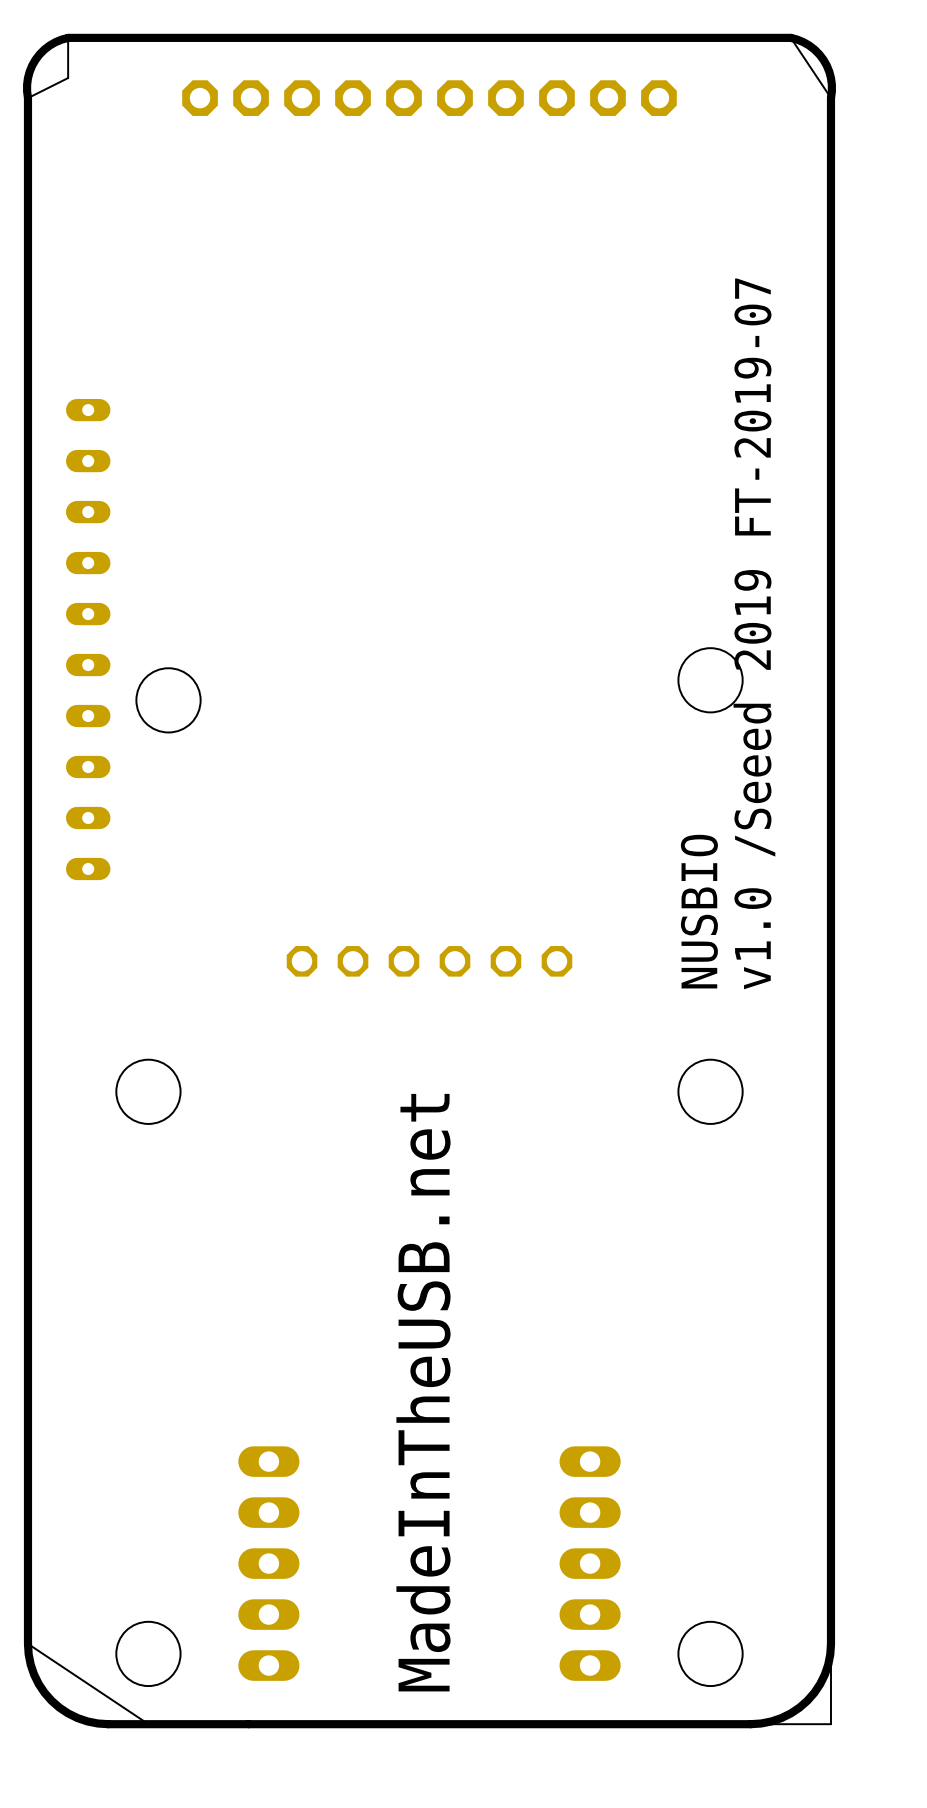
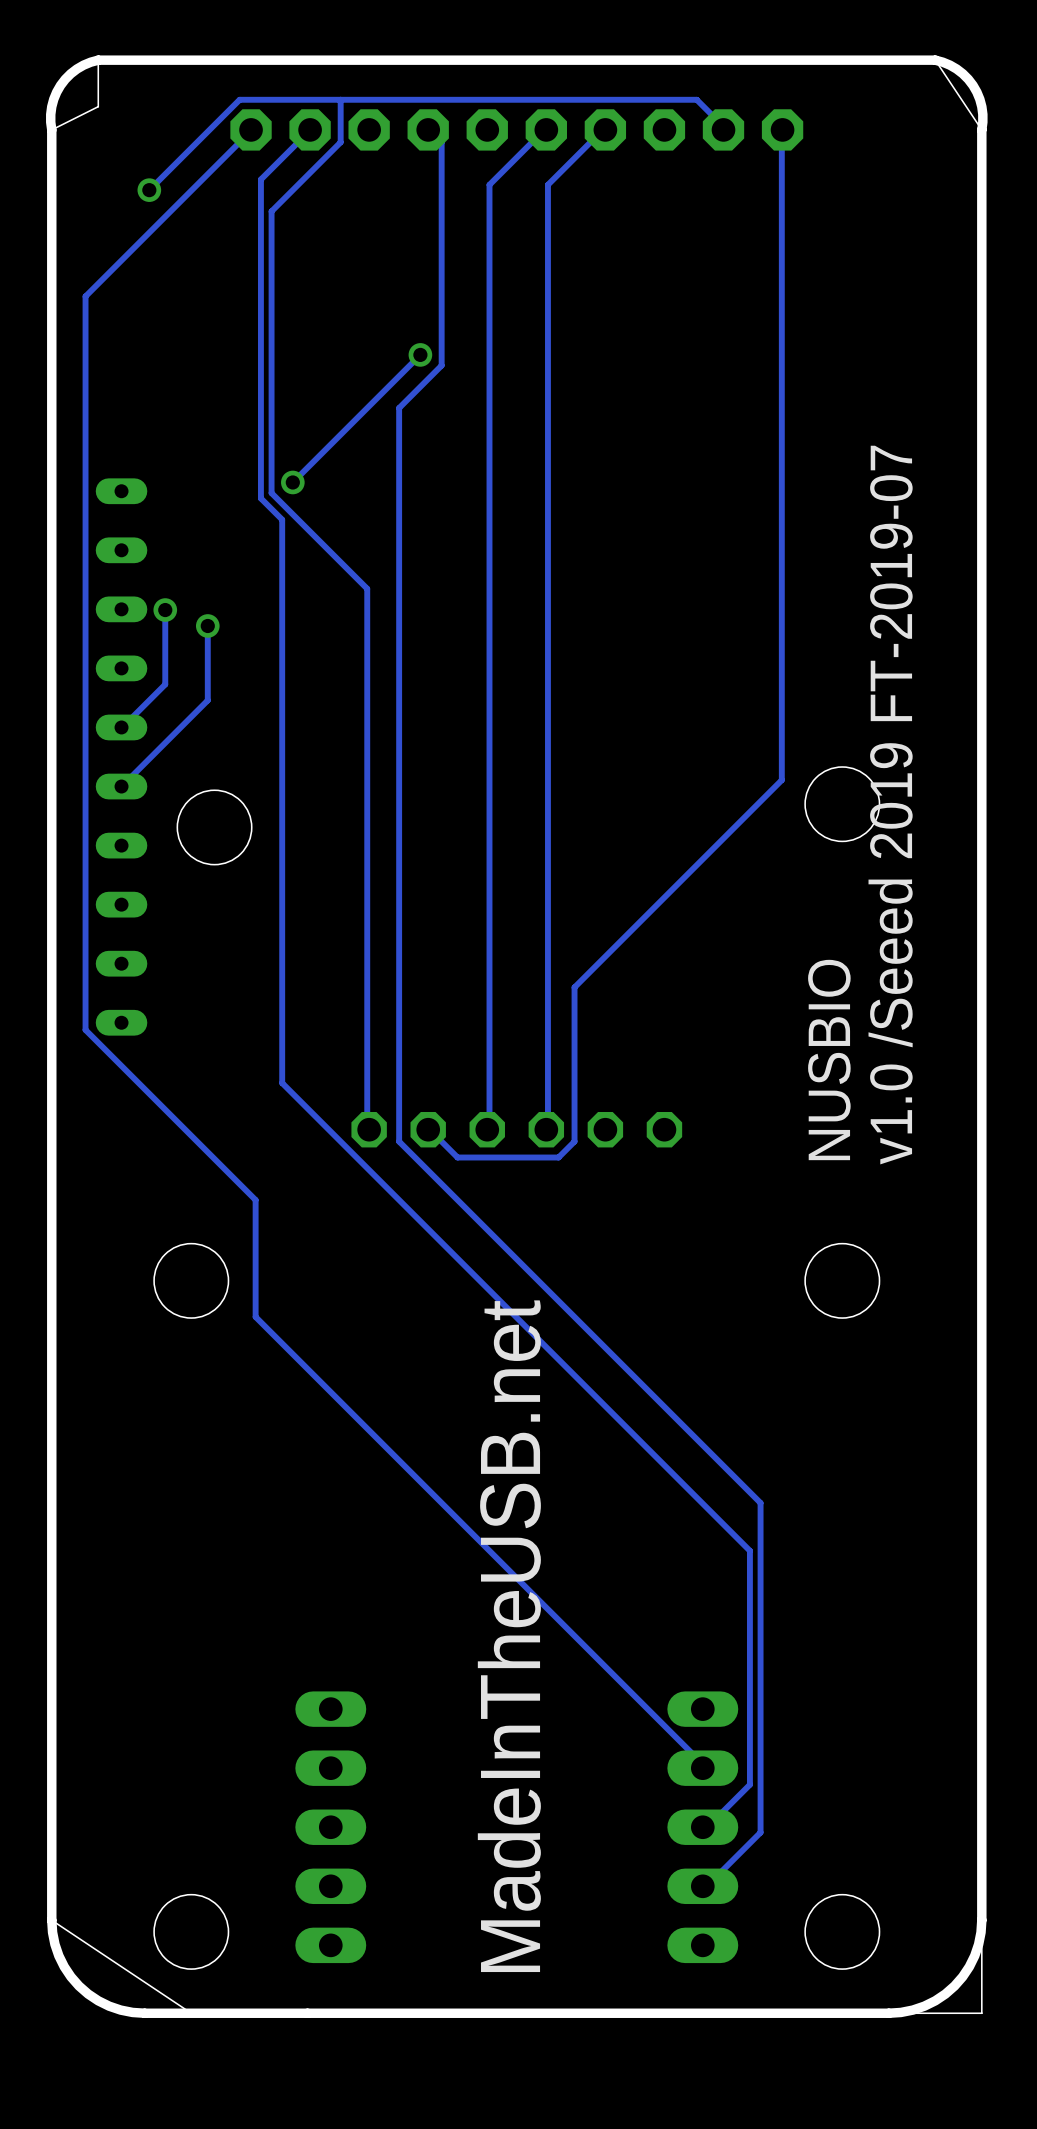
track: none -> (340, 99) (340, 142) (271, 211) (271, 493) (367, 588) (367, 1125) (369, 1129)
track: none -> (251, 129) (85, 296) (85, 1029) (255, 1200) (255, 1316) (702, 1763) (702, 1768)
track: none -> (310, 129) (260, 179) (260, 498) (282, 519) (282, 1083) (749, 1550) (749, 1784) (707, 1827) (702, 1827)
track: none -> (428, 129) (441, 142) (441, 365) (399, 408) (399, 1141) (760, 1502) (760, 1832) (707, 1885) (702, 1886)
track: none -> (546, 129) (489, 184) (489, 1125) (487, 1129)
track: none -> (605, 129) (601, 131) (547, 184) (547, 1125) (546, 1129)
track: none -> (723, 129) (723, 126) (696, 99) (239, 99) (149, 190)
track: none -> (782, 129) (781, 780) (574, 987) (574, 1141) (558, 1157) (457, 1157) (428, 1129)
via: none -> (149, 190)
track: none -> (420, 354) (292, 482)
via: none -> (420, 354)
via: none -> (292, 482)
track: none -> (165, 610) (165, 684) (121, 727)
via: none -> (165, 610)
track: none -> (207, 625) (207, 700) (121, 786)
via: none -> (207, 625)

